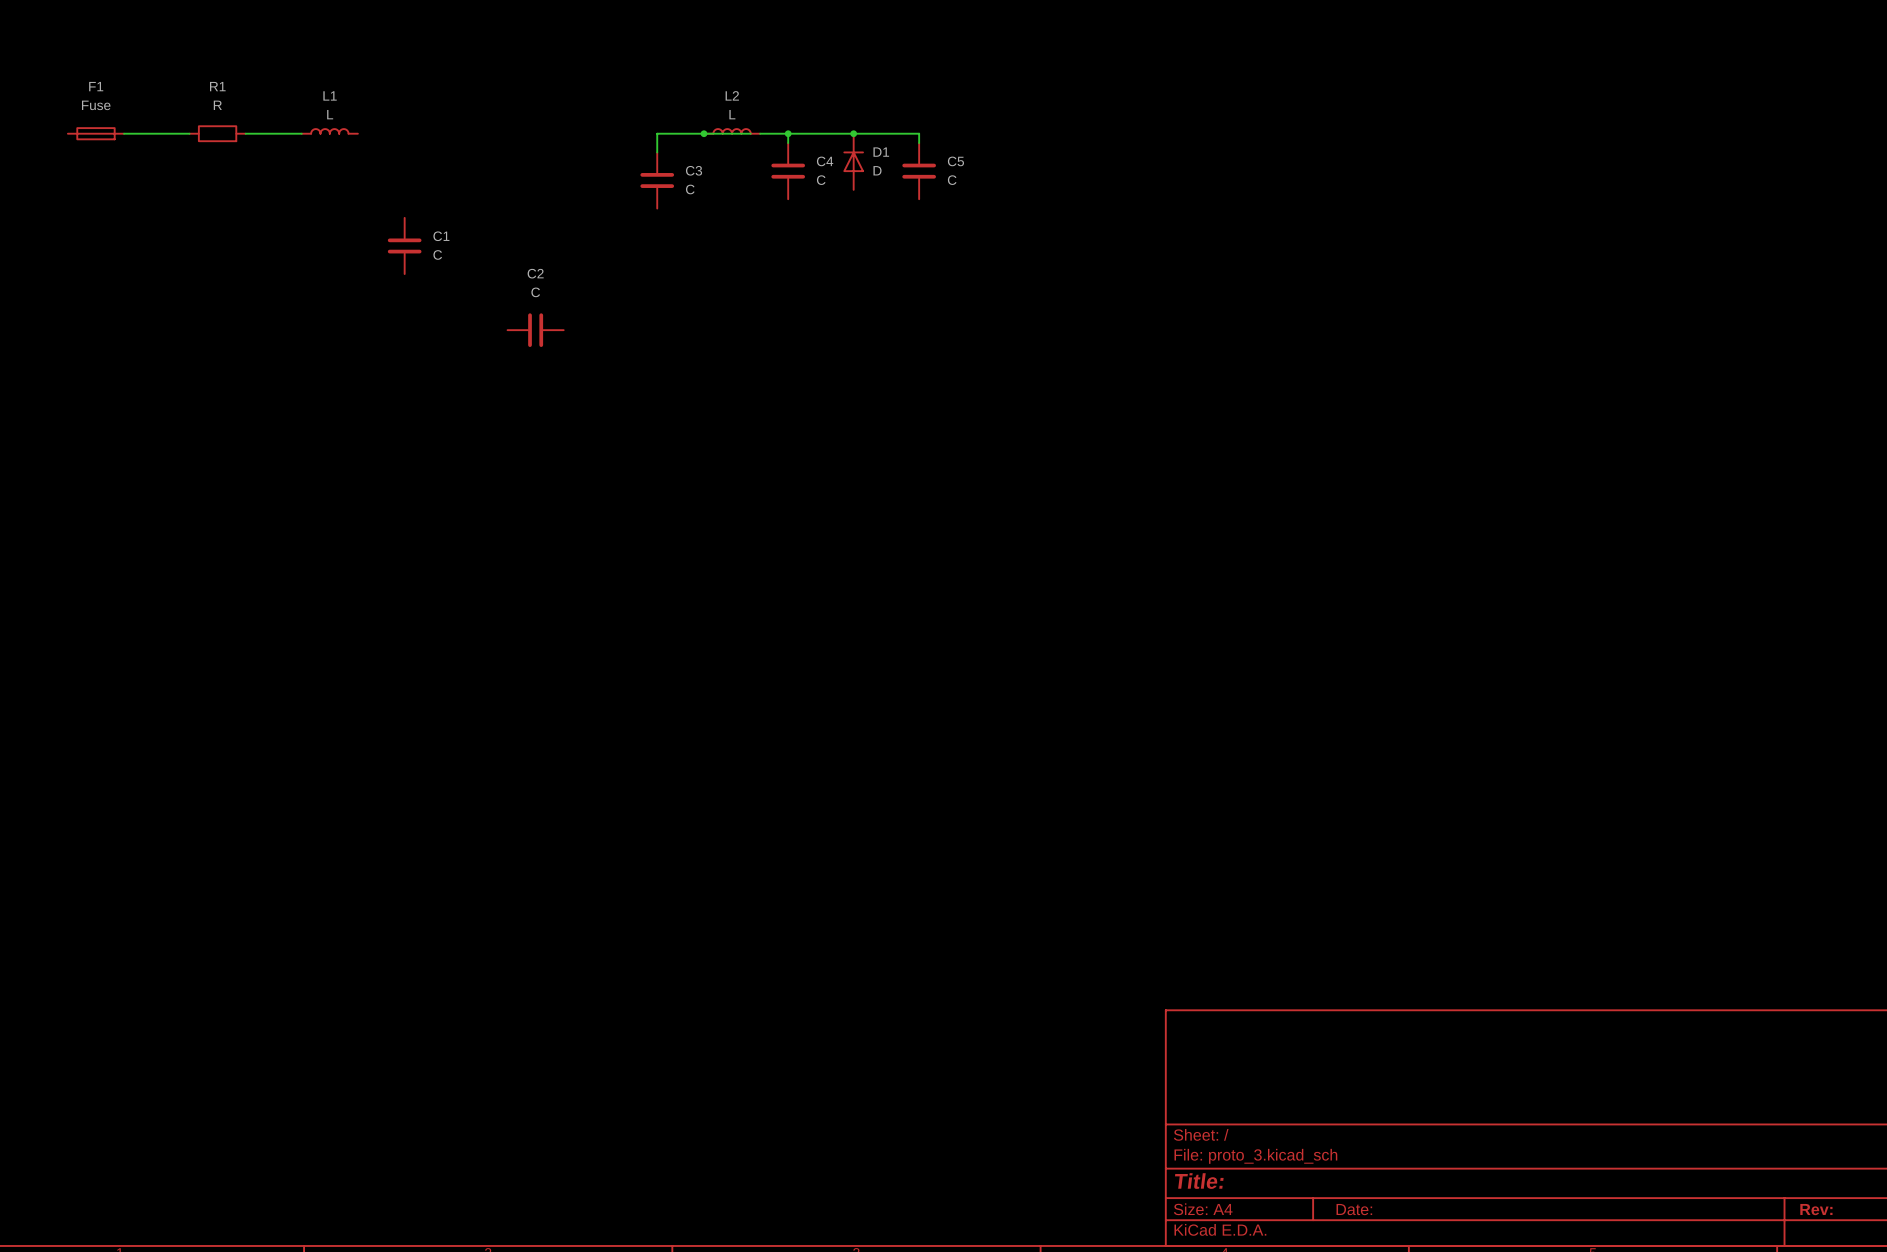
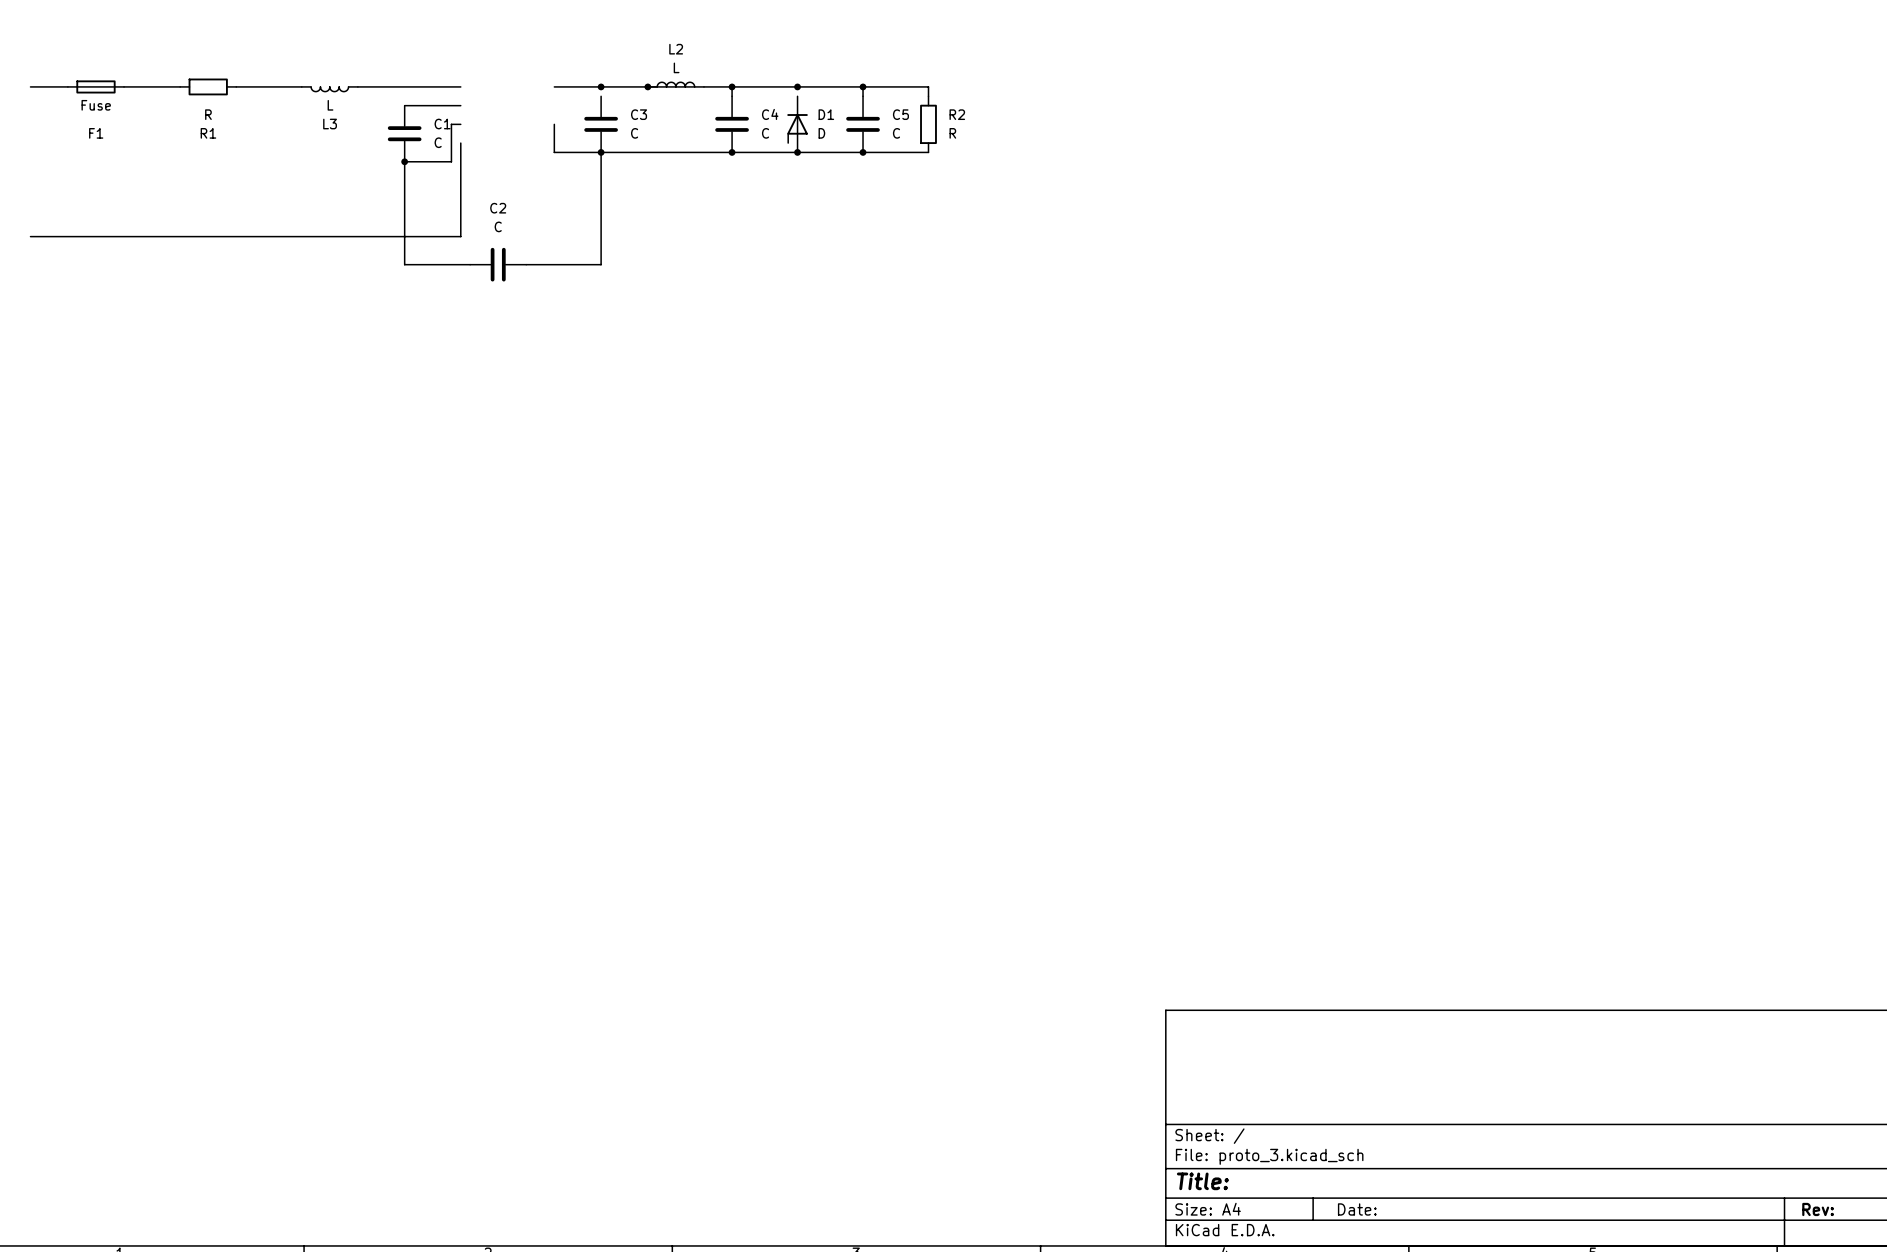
wire: none -> (30, 86) (67, 86)
F1 name position: F1 (96, 86) -> F1 (96, 133)
R1 name position: R1 (217, 86) -> R1 (208, 133)
wire: none -> (357, 86) (460, 86)
wire: none -> (554, 86) (694, 86)
junction: none -> (601, 86)
junction: none -> (647, 86)
wire: none -> (703, 86) (928, 86) (928, 96)
wire: none -> (732, 86) (732, 96)
junction: none -> (732, 86)
junction: none -> (797, 86)
wire: none -> (863, 86) (863, 96)
junction: none -> (863, 86)
L3: none -> L (329, 89)
R1 value position: R (217, 105) -> R (208, 114)
wire: none -> (404, 105) (460, 105)
wire: none -> (460, 124) (451, 124) (451, 161) (404, 161) (404, 264) (470, 264)
wire: none -> (554, 124) (554, 152) (928, 152)
R2: none -> R (928, 124)
L1: L (329, 131) -> none
L2 position: (732, 131) -> (675, 84)
F1 position: (95, 133) -> (95, 86)
wire: (124, 133) (189, 133) -> (236, 86) (301, 86)
R1 position: (217, 133) -> (208, 86)
wire: (245, 133) (301, 133) -> (124, 86) (180, 86)
junction: (703, 133) -> none
wire: (750, 133) (657, 133) (657, 152) -> none
wire: (760, 133) (919, 133) (919, 143) -> none
junction position: (788, 133) -> (797, 152)
junction position: (853, 133) -> (863, 152)
wire: none -> (460, 143) (460, 236) (30, 236)
wire: none -> (601, 152) (601, 264) (526, 264)
junction: none -> (601, 152)
junction: none -> (732, 152)
junction: none -> (404, 161)
D1 position: (853, 161) -> (797, 124)
C4 position: (788, 171) -> (732, 124)
C5 position: (919, 171) -> (863, 124)
C3 position: (657, 180) -> (601, 124)
C1 position: (404, 245) -> (404, 133)
C2 position: (535, 330) -> (498, 264)

